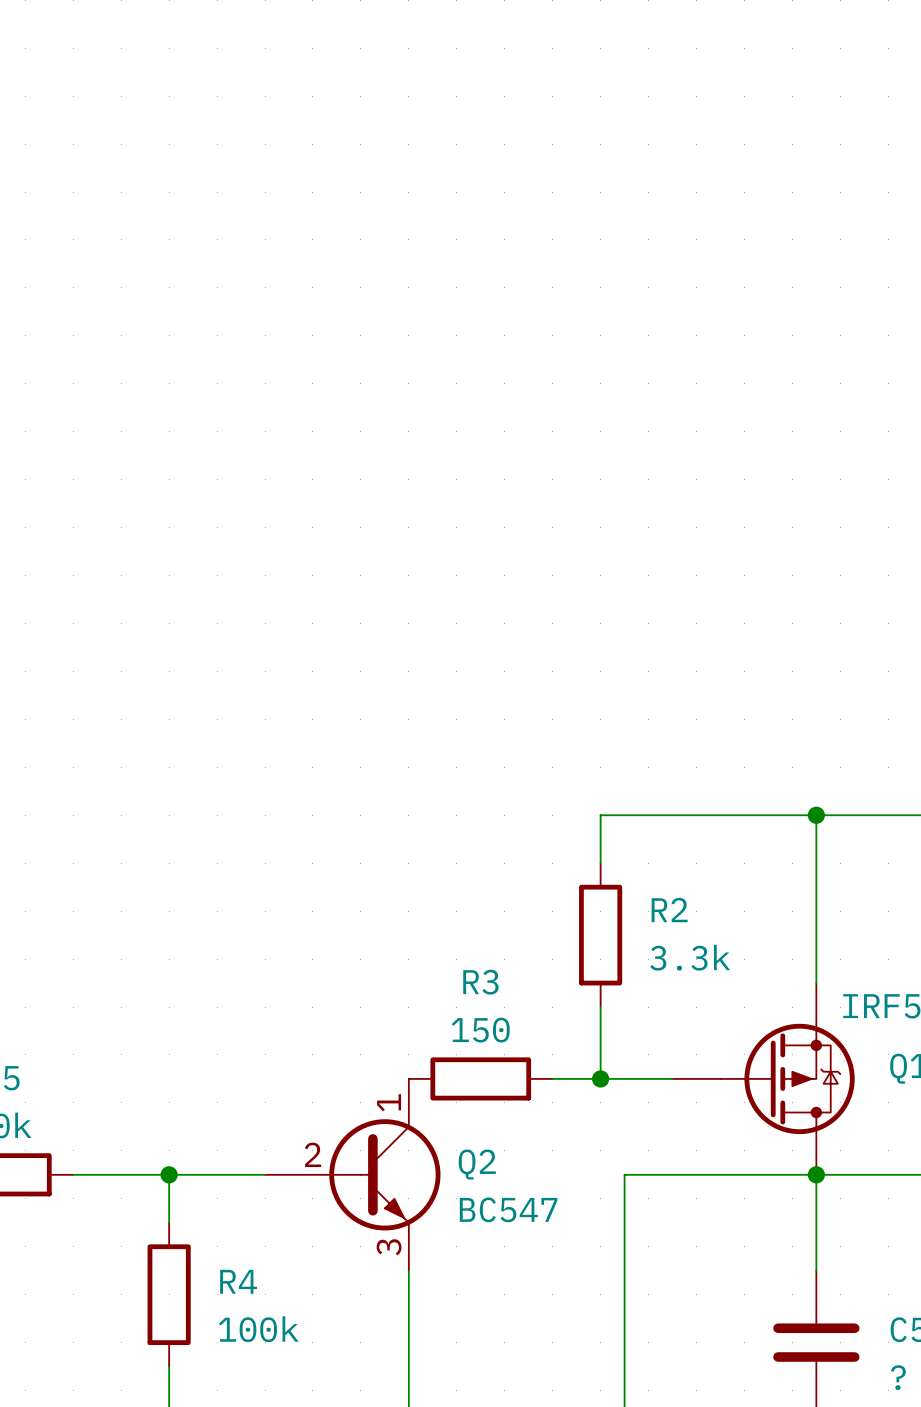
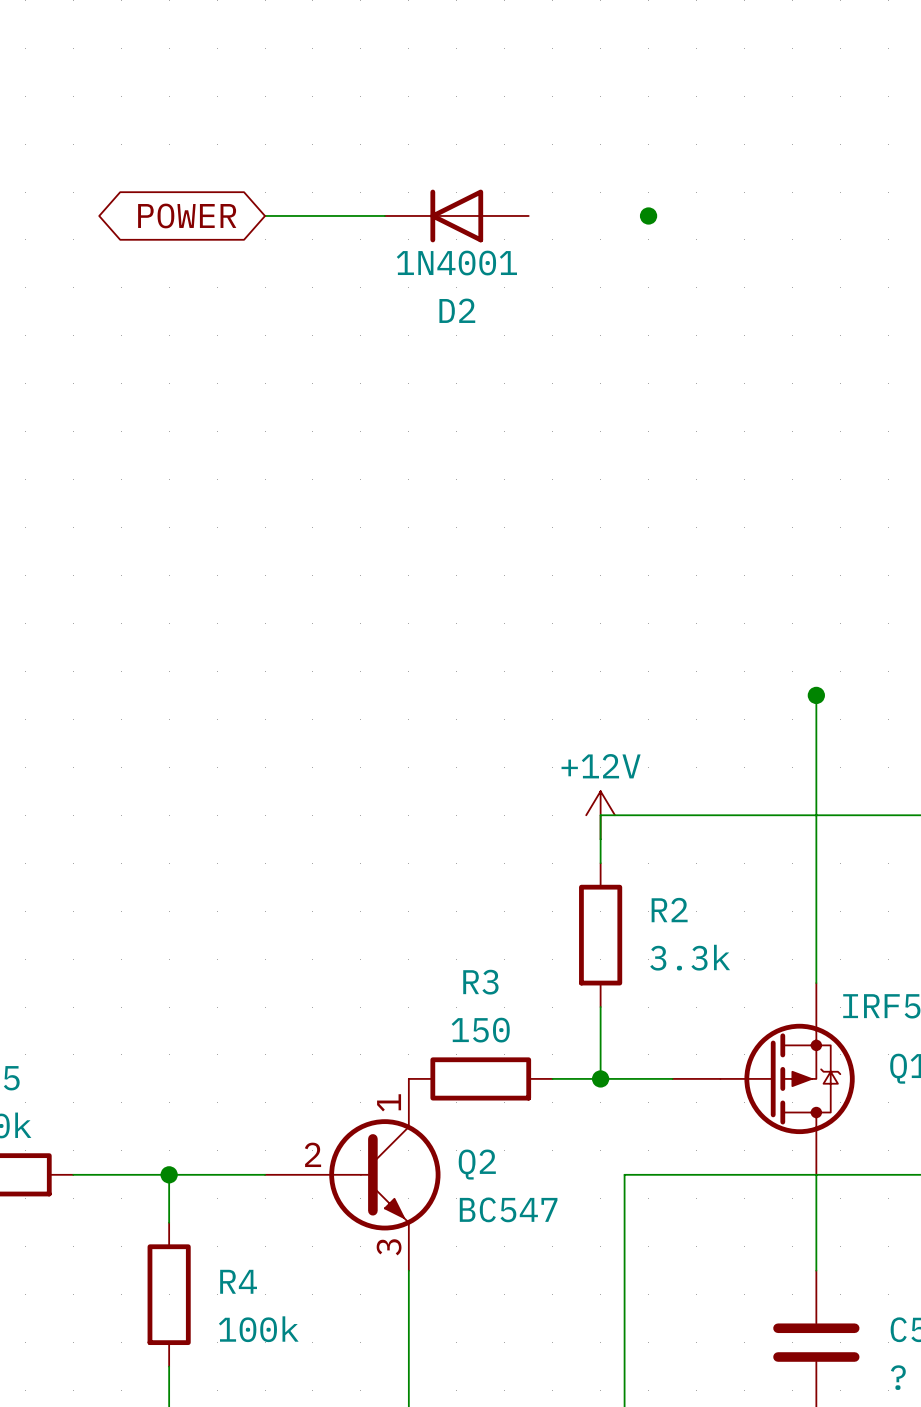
global label: none -> POWER (187, 215)
wire: none -> (265, 215) (384, 215)
D2: none -> 1N4001 (456, 215)
junction: none -> (648, 215)
wire: none -> (816, 695) (816, 815)
junction: none -> (816, 695)
power symbol: none -> +12V (600, 815)
junction: (816, 815) -> none
junction: (816, 1174) -> none

